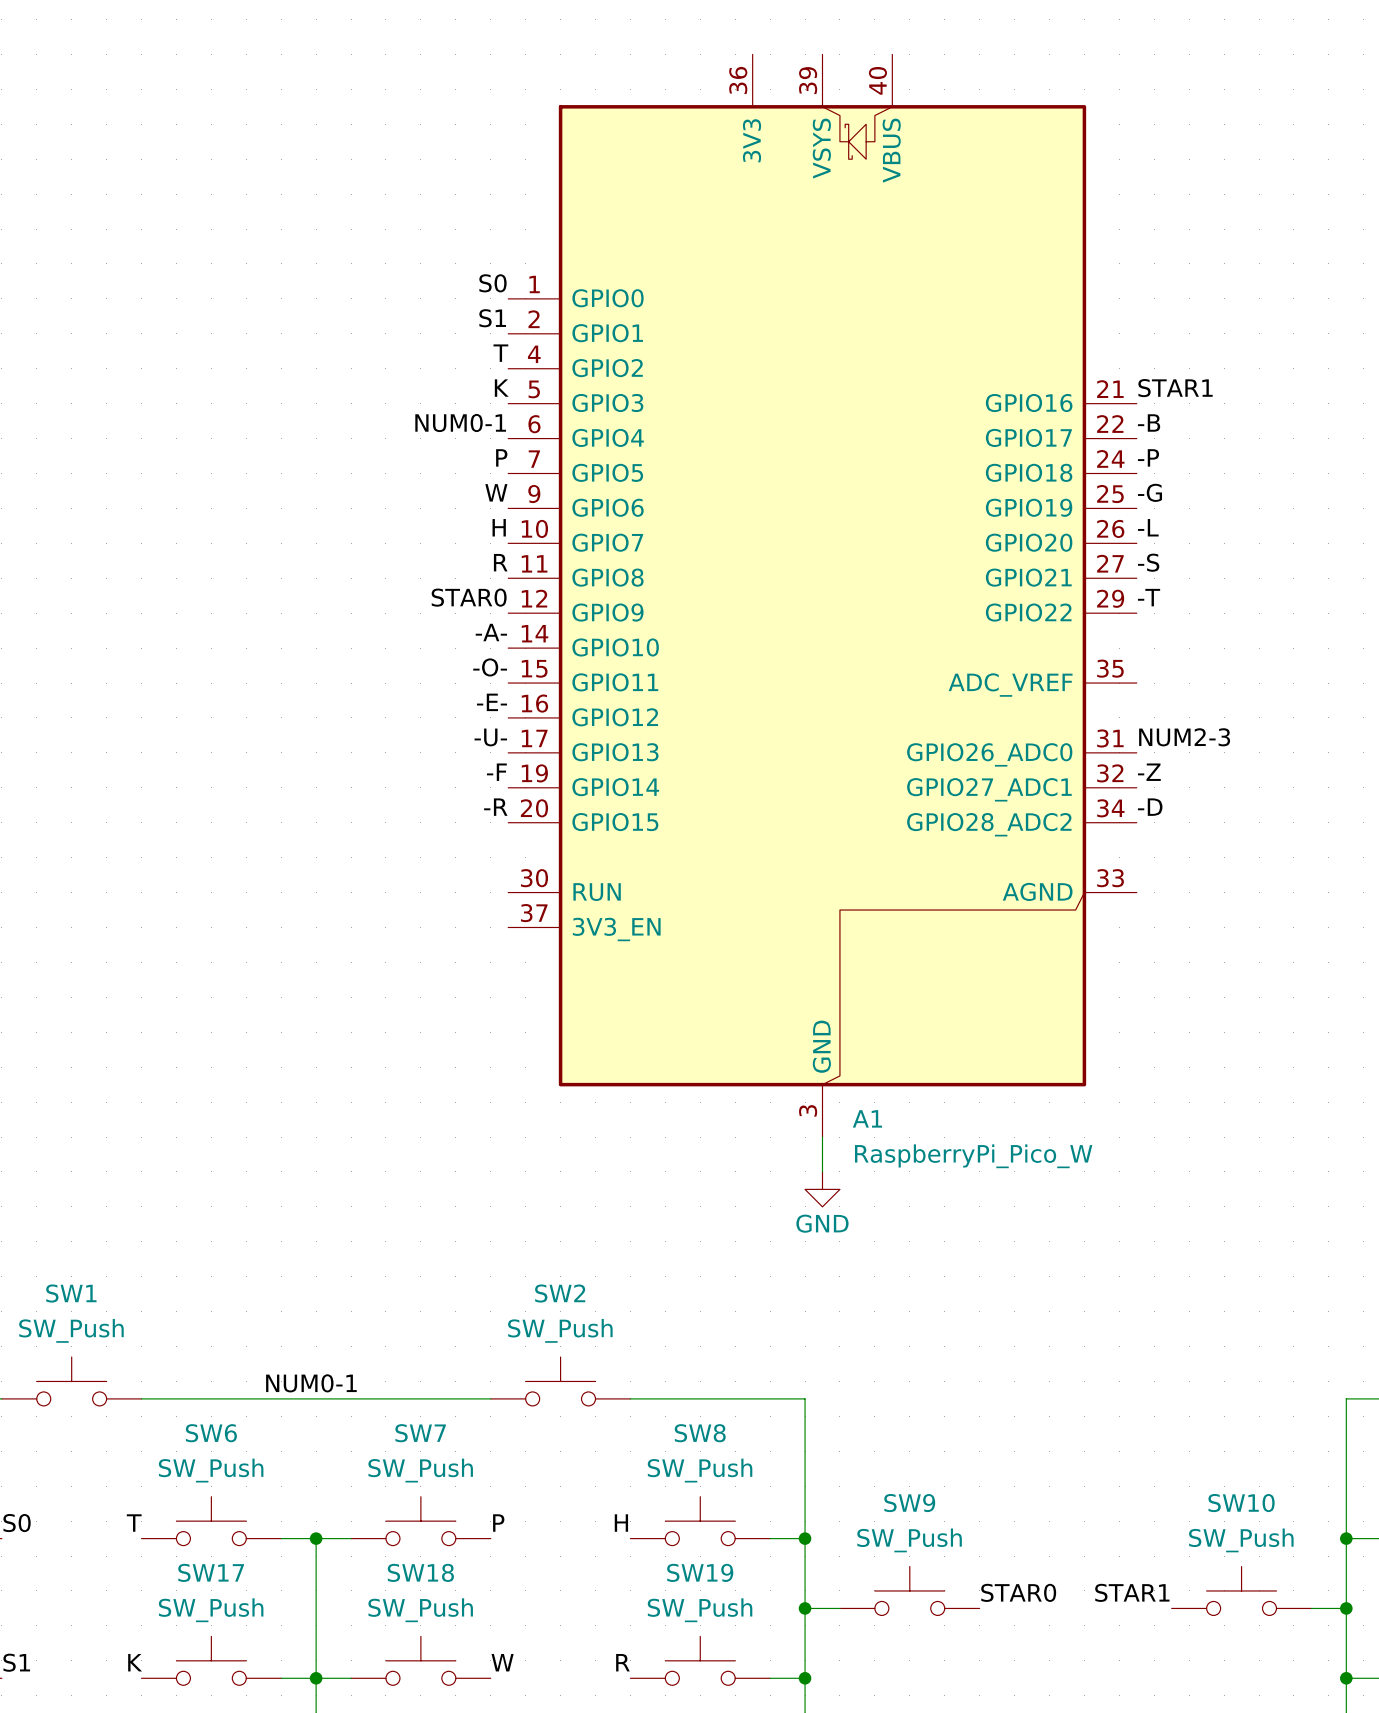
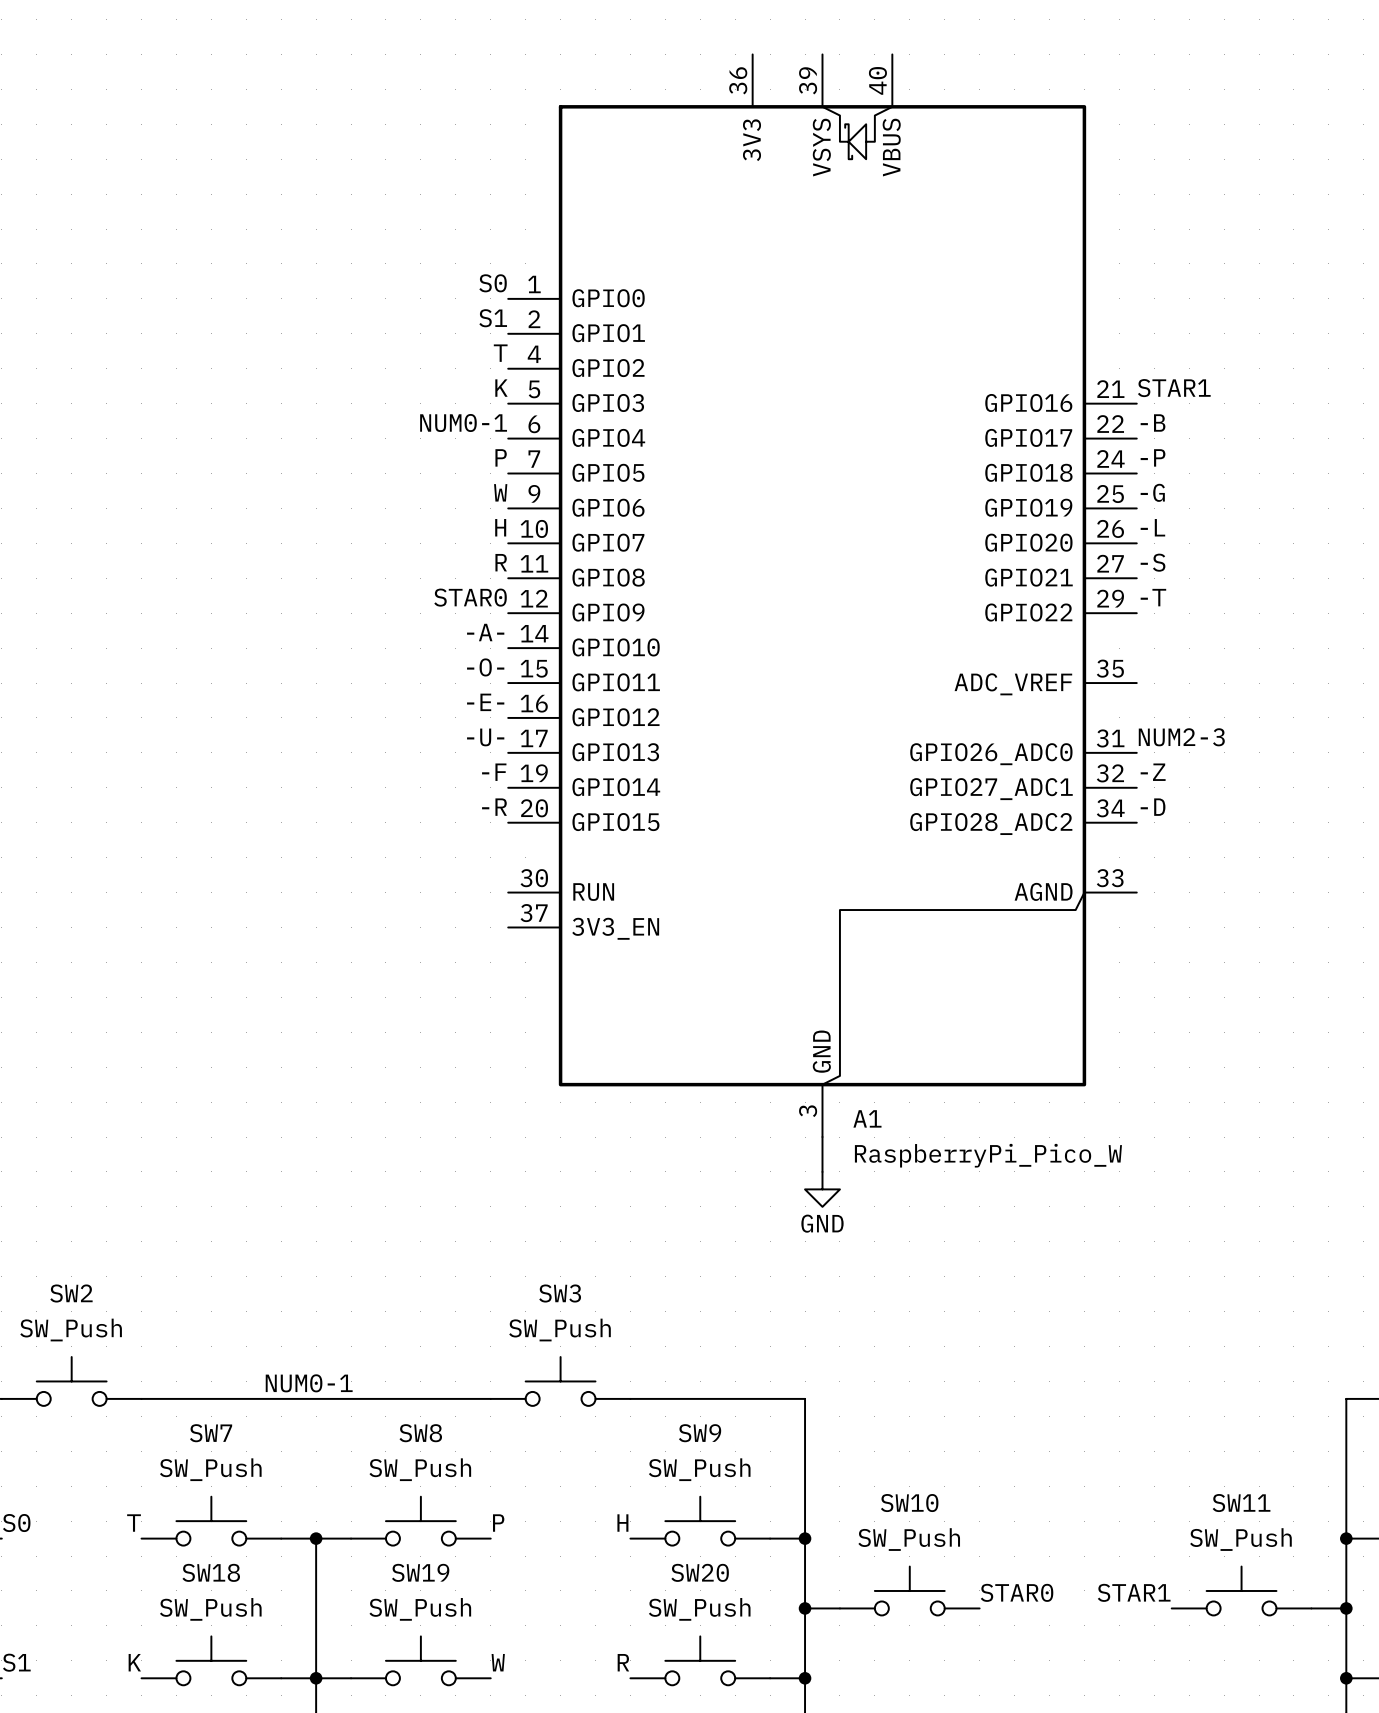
SW1 name: SW1 (71, 1293) -> SW2 (71, 1293)
SW2 name: SW2 (560, 1293) -> SW3 (560, 1293)
SW6 name: SW6 (211, 1433) -> SW7 (211, 1433)
SW7 name: SW7 (420, 1433) -> SW8 (420, 1433)
SW8 name: SW8 (700, 1433) -> SW9 (700, 1433)
SW9 name: SW9 (909, 1503) -> SW10 (909, 1503)
SW10 name: SW10 (1241, 1503) -> SW11 (1241, 1503)
SW17 name: SW17 (211, 1572) -> SW18 (211, 1572)
SW18 name: SW18 (420, 1572) -> SW19 (420, 1572)
SW19 name: SW19 (700, 1572) -> SW20 (700, 1572)

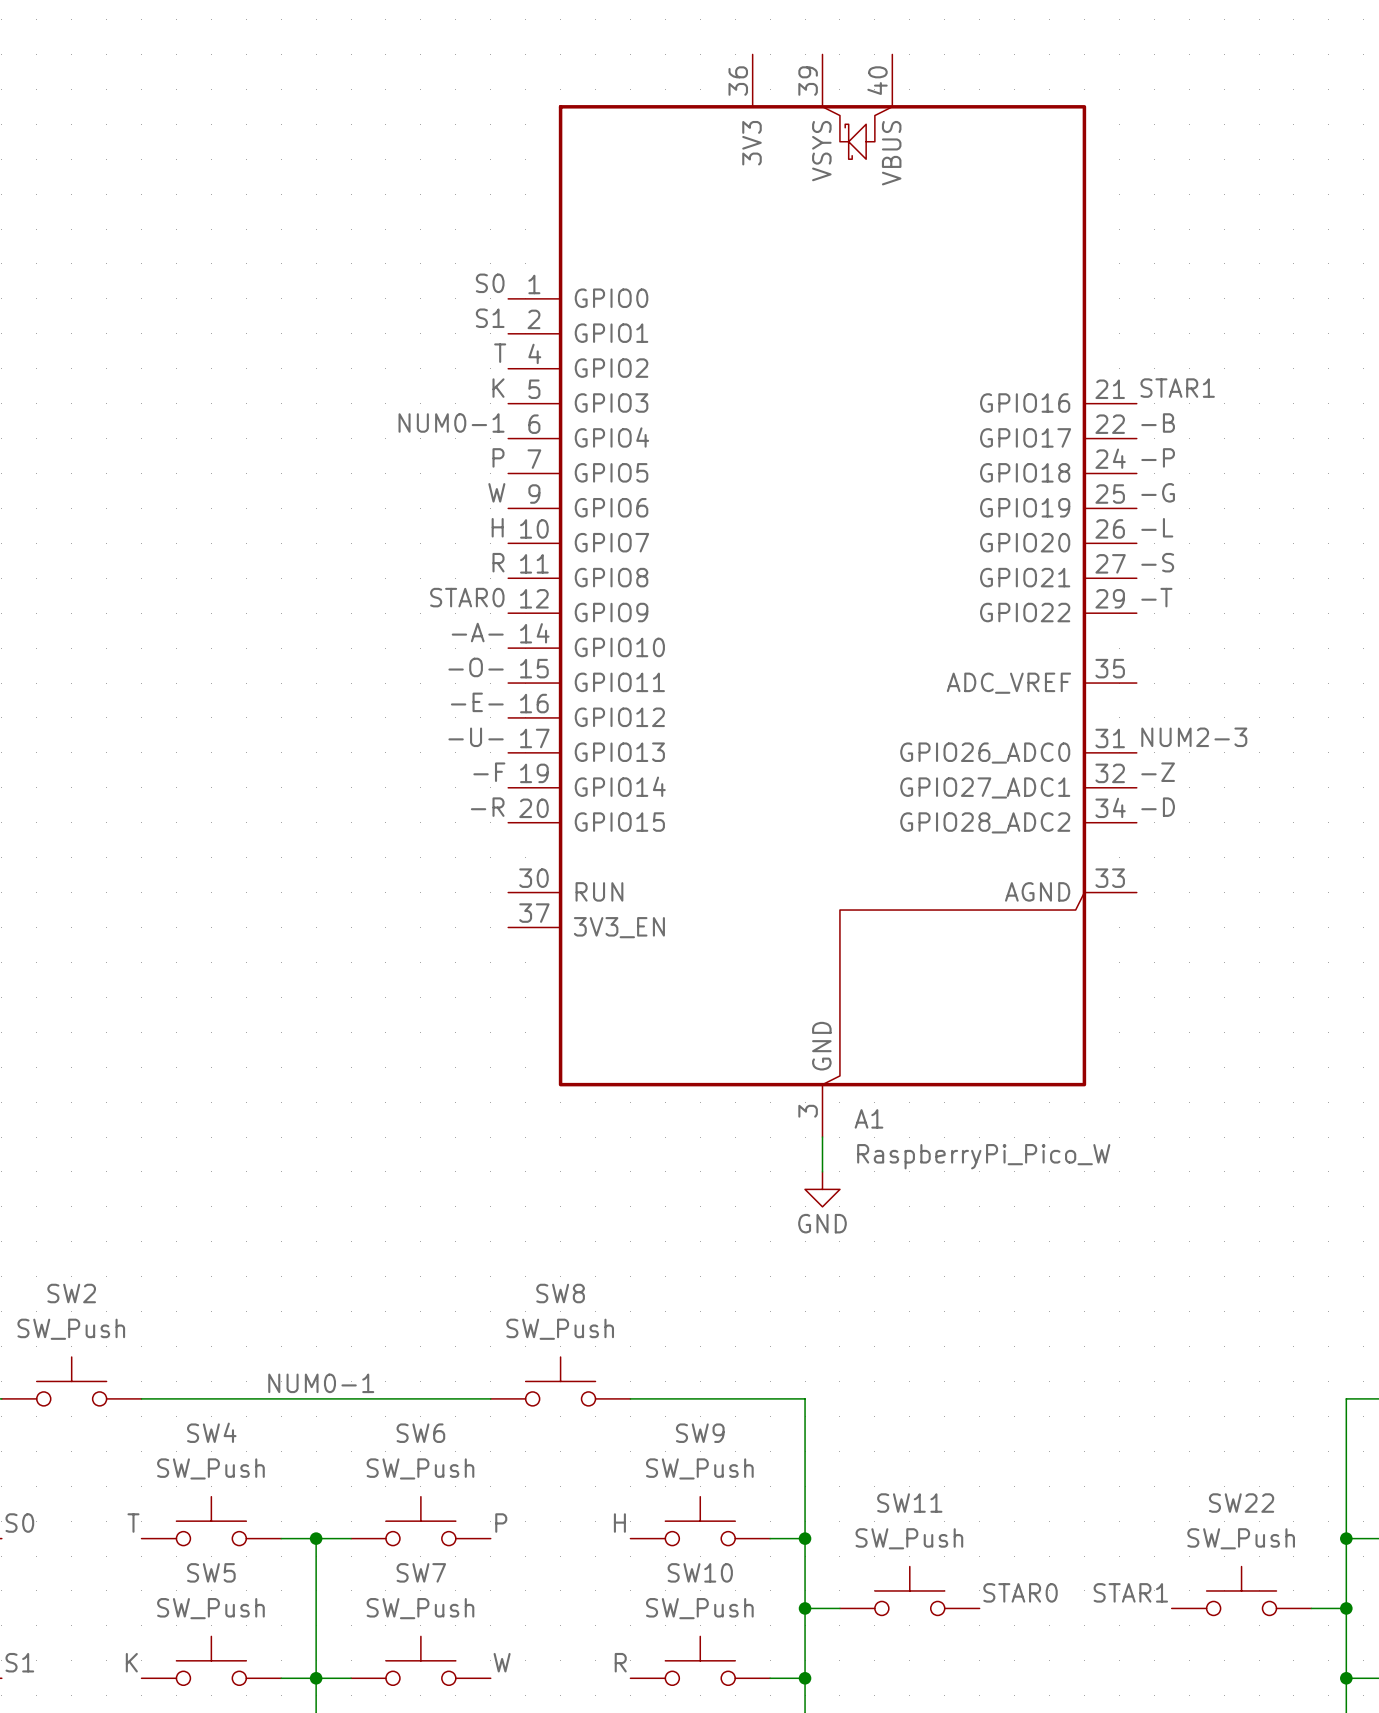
SW3 name: SW3 (560, 1293) -> SW8 (560, 1293)
SW7 name: SW7 (211, 1433) -> SW4 (211, 1432)
SW8 name: SW8 (420, 1433) -> SW6 (420, 1433)
SW10 name: SW10 (909, 1503) -> SW11 (909, 1503)
SW11 name: SW11 (1241, 1503) -> SW22 (1241, 1503)
SW18 name: SW18 (211, 1572) -> SW5 (211, 1572)
SW19 name: SW19 (420, 1572) -> SW7 (421, 1572)
SW20 name: SW20 (700, 1572) -> SW10 (700, 1572)

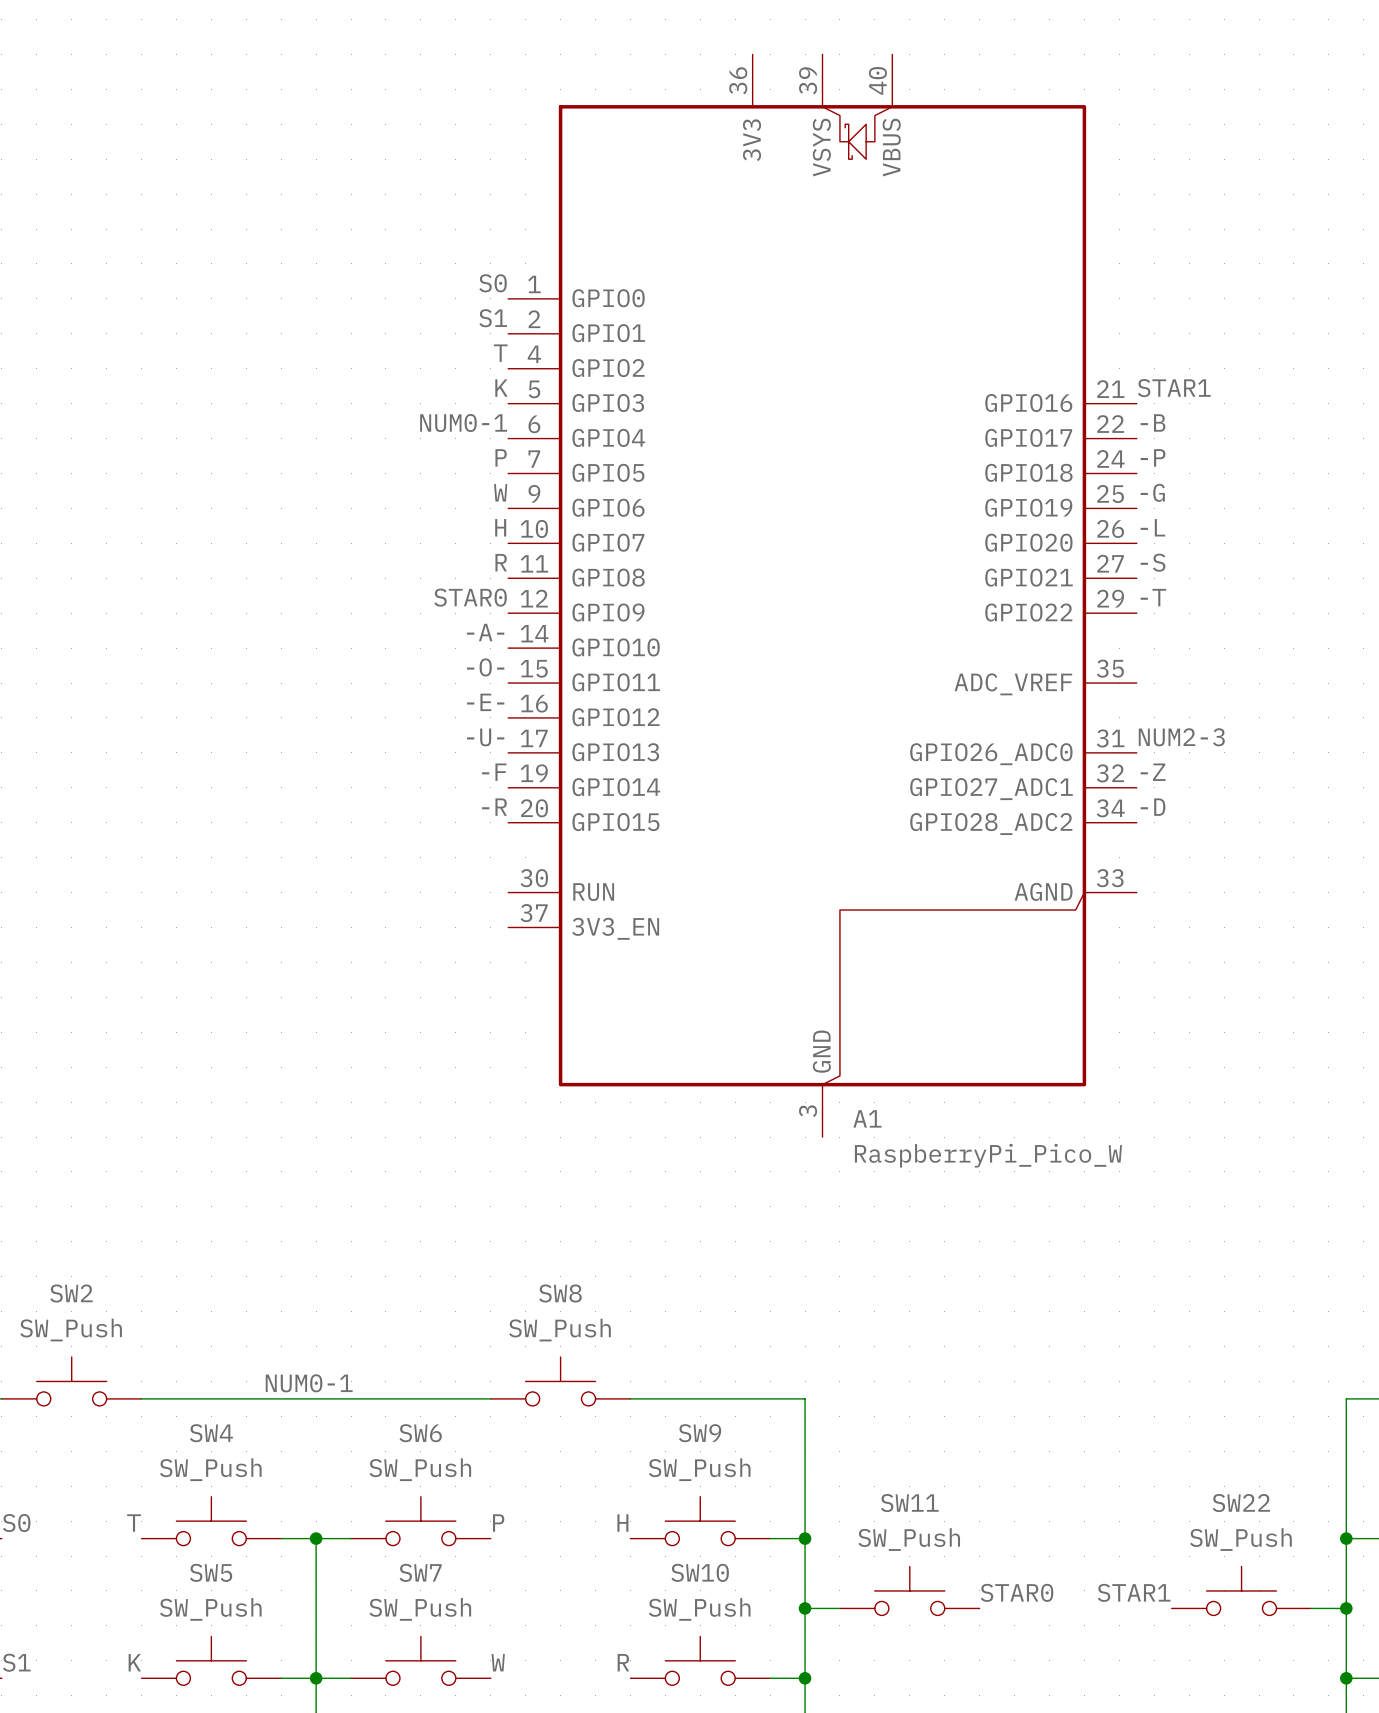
wire: (822, 1137) (822, 1171) -> none
power symbol: GND (822, 1189) -> none

